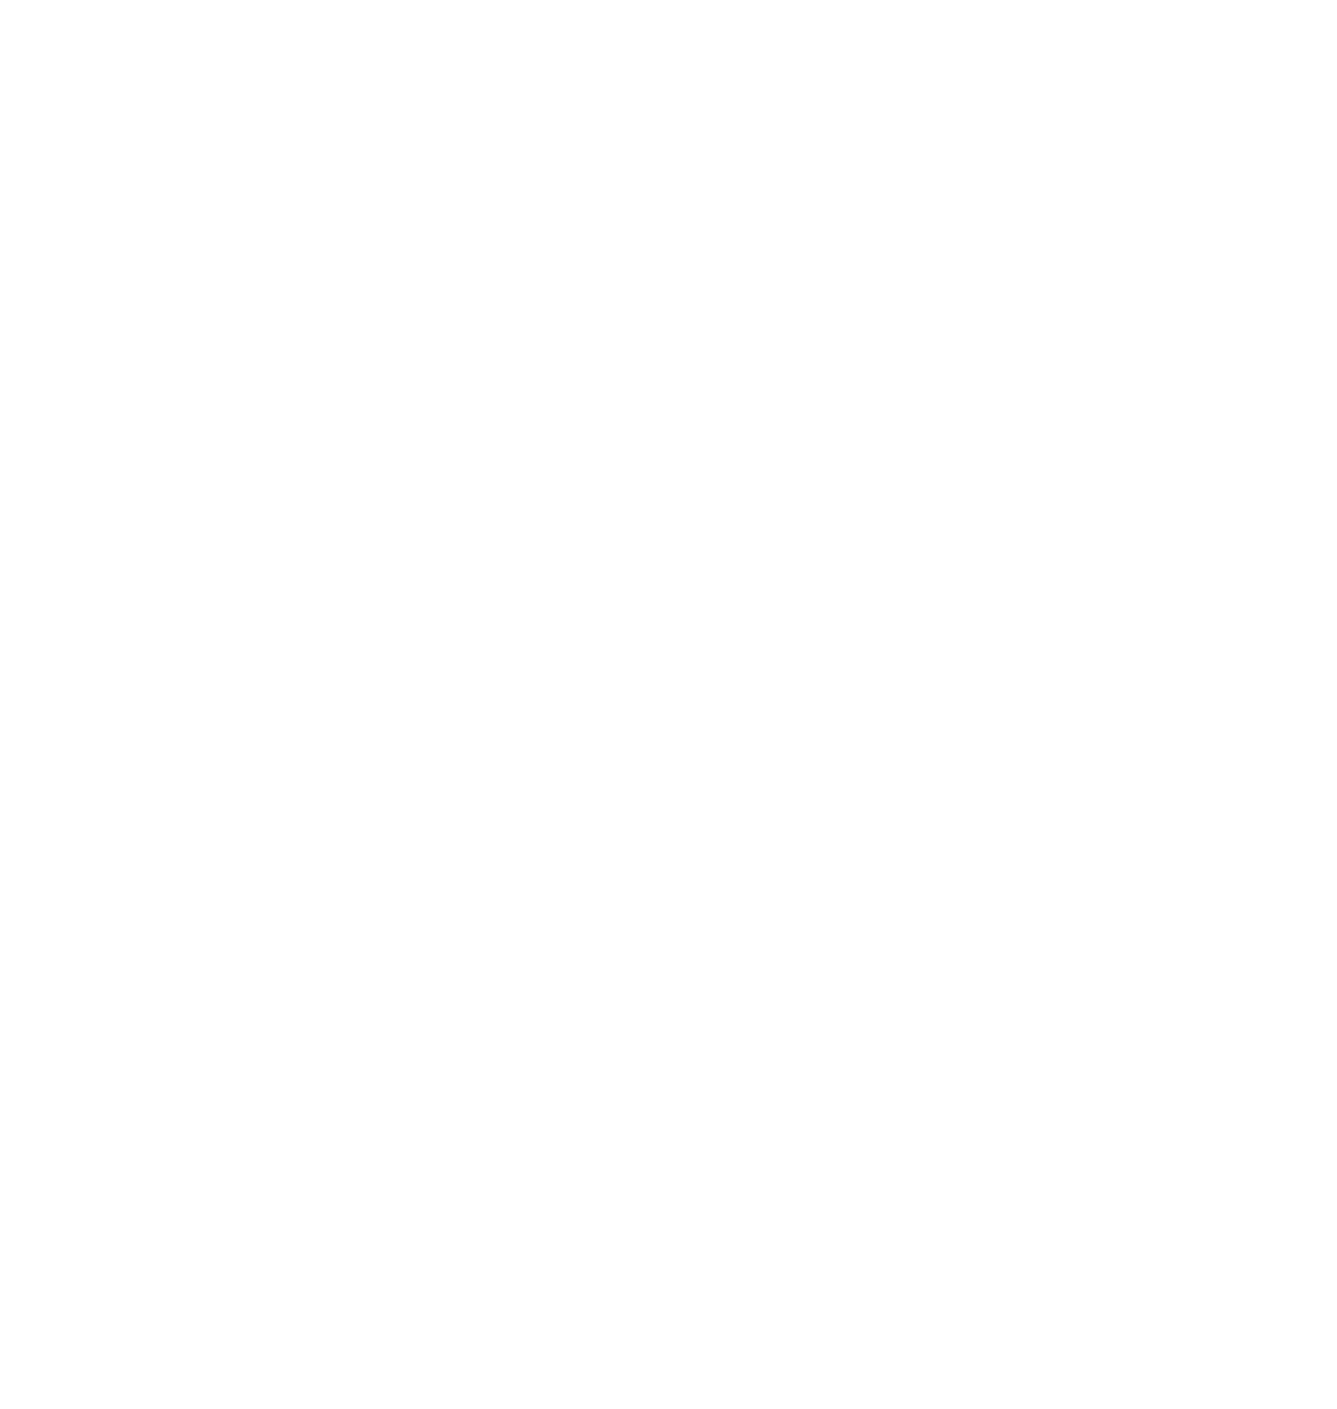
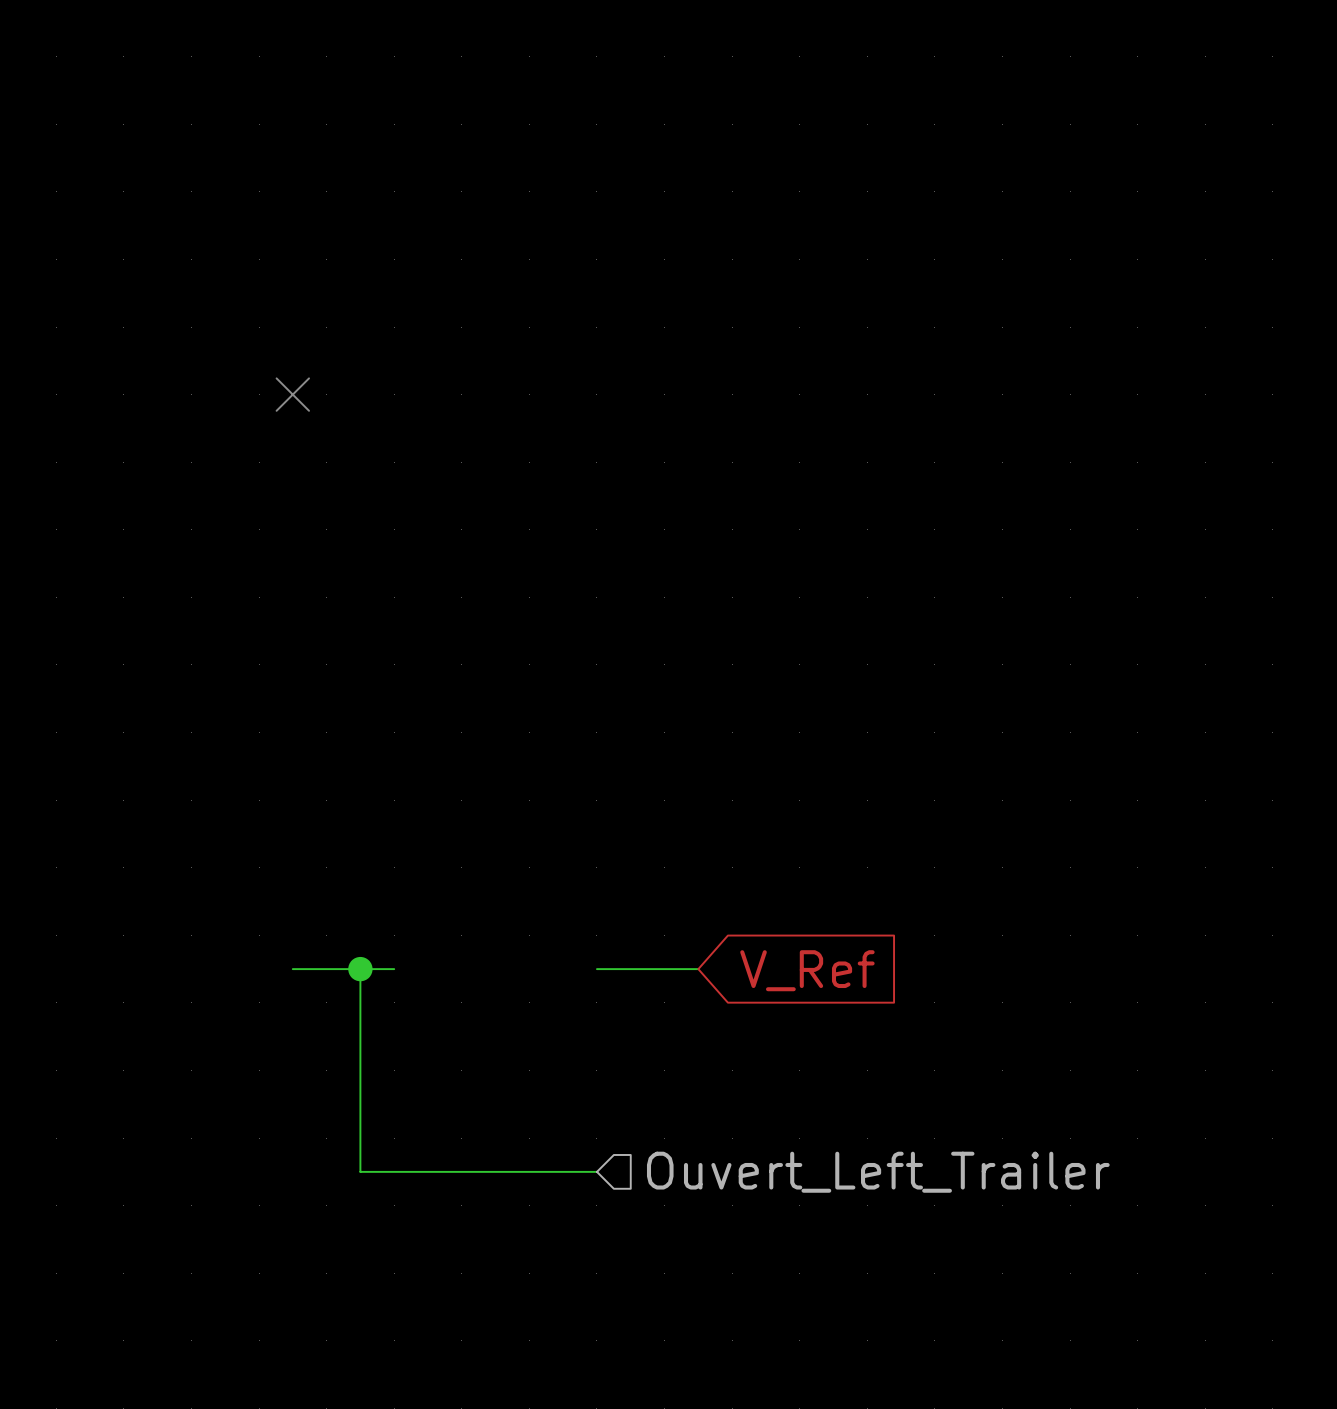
no-connect mark: none -> (292, 394)
wire: none -> (292, 969) (394, 969)
wire: none -> (360, 969) (360, 1171) (596, 1171)
junction: none -> (360, 969)
wire: none -> (596, 969) (698, 969)
global label: none -> V_Ref (807, 970)
hierarchical label: none -> Ouvert_Left_Trailer (878, 1172)

